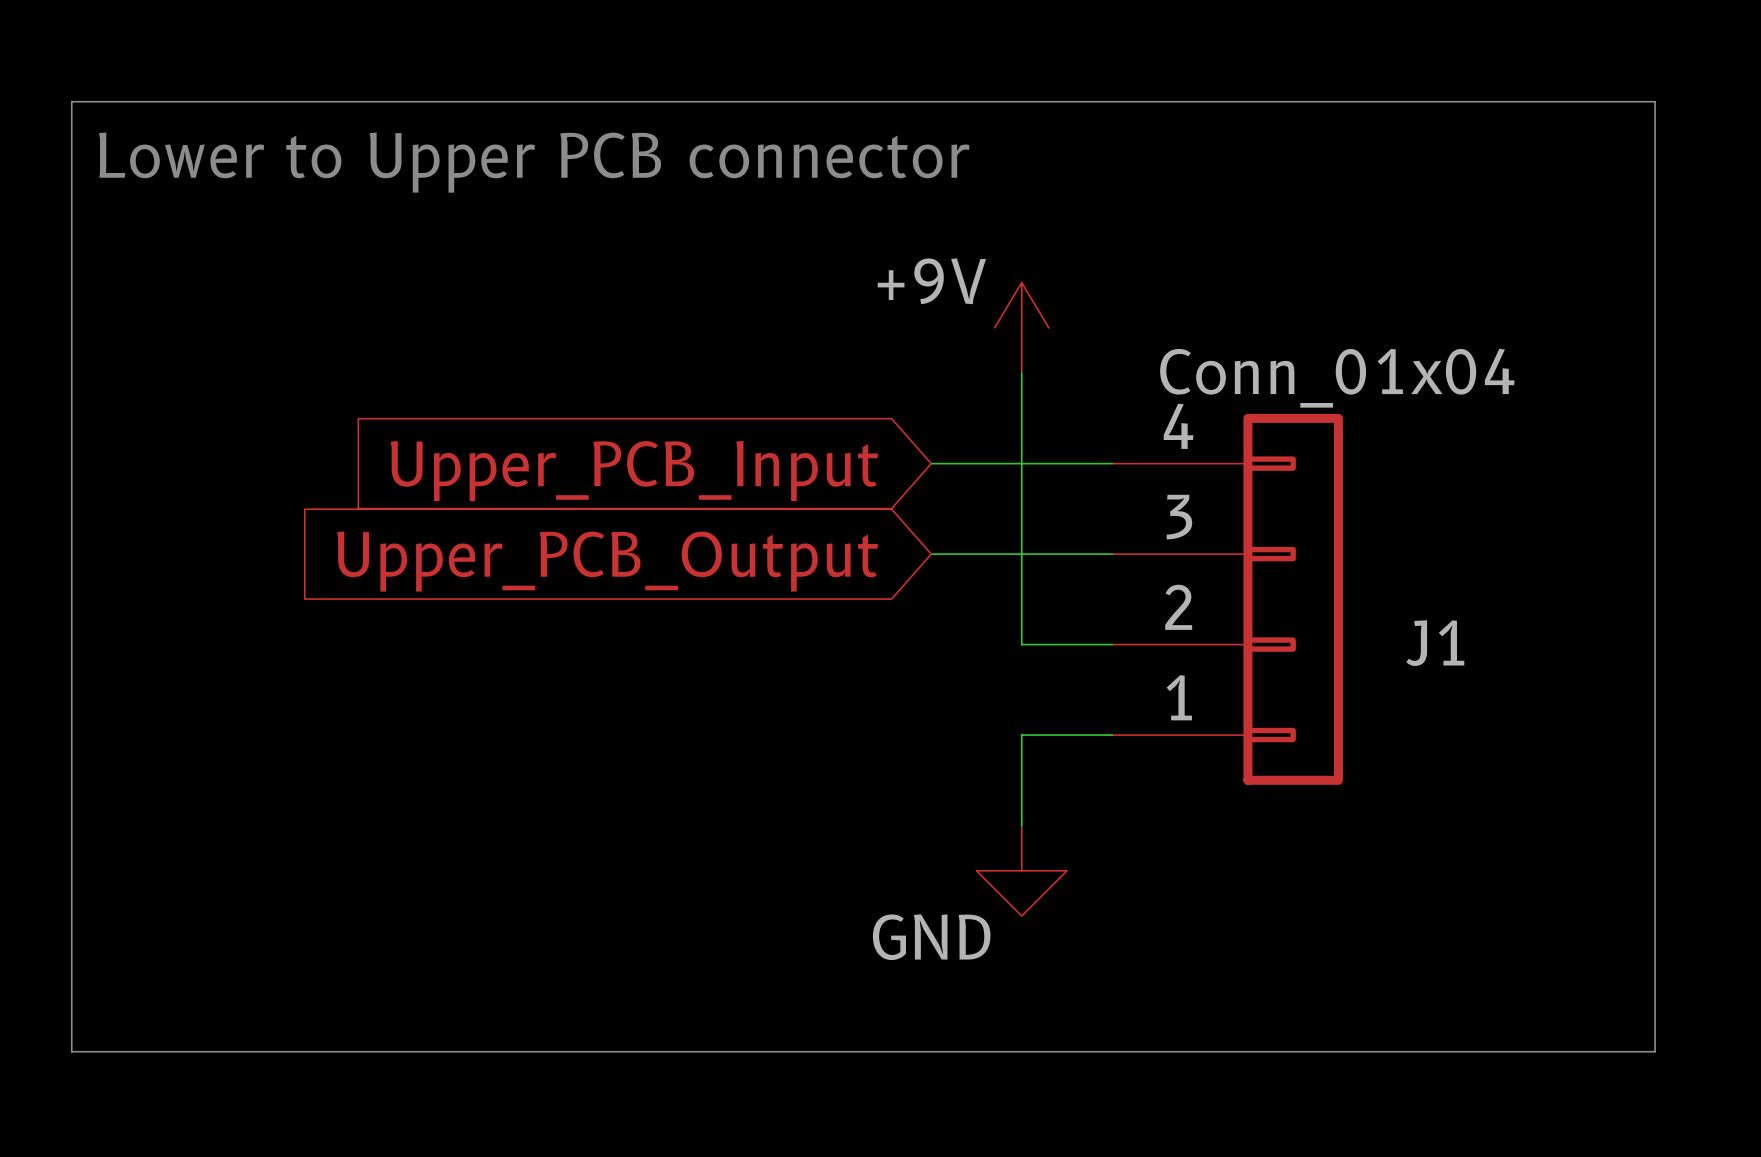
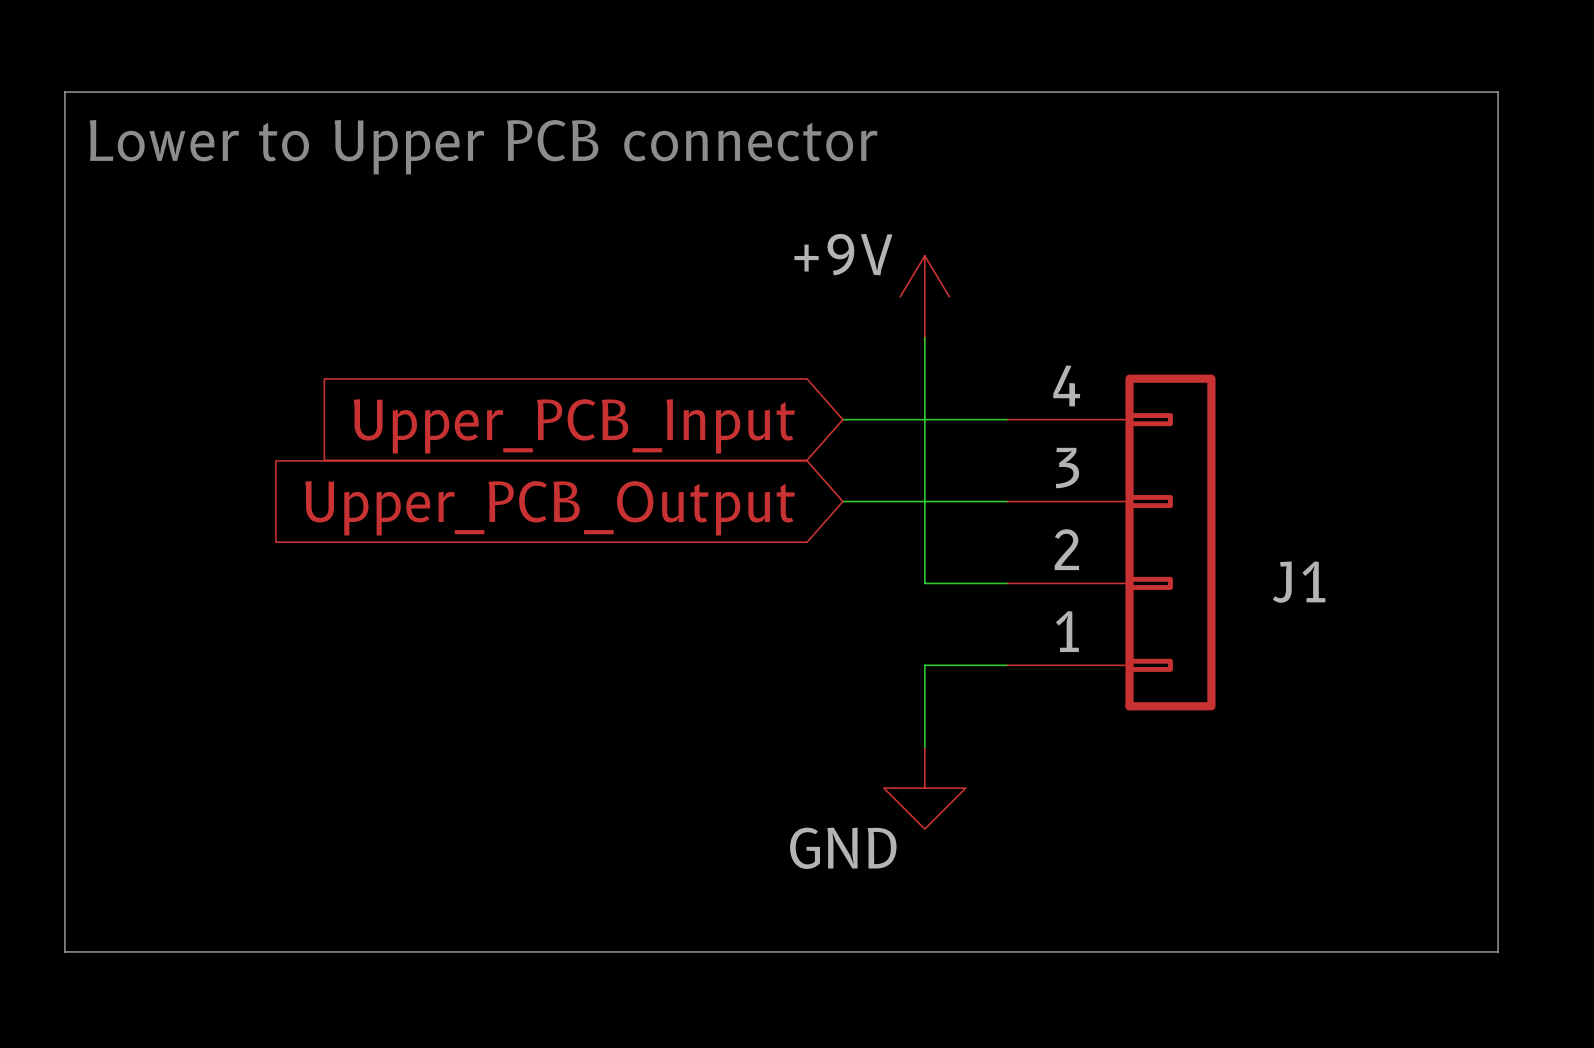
J1 value: Conn_01x04 (1337, 378) -> none

